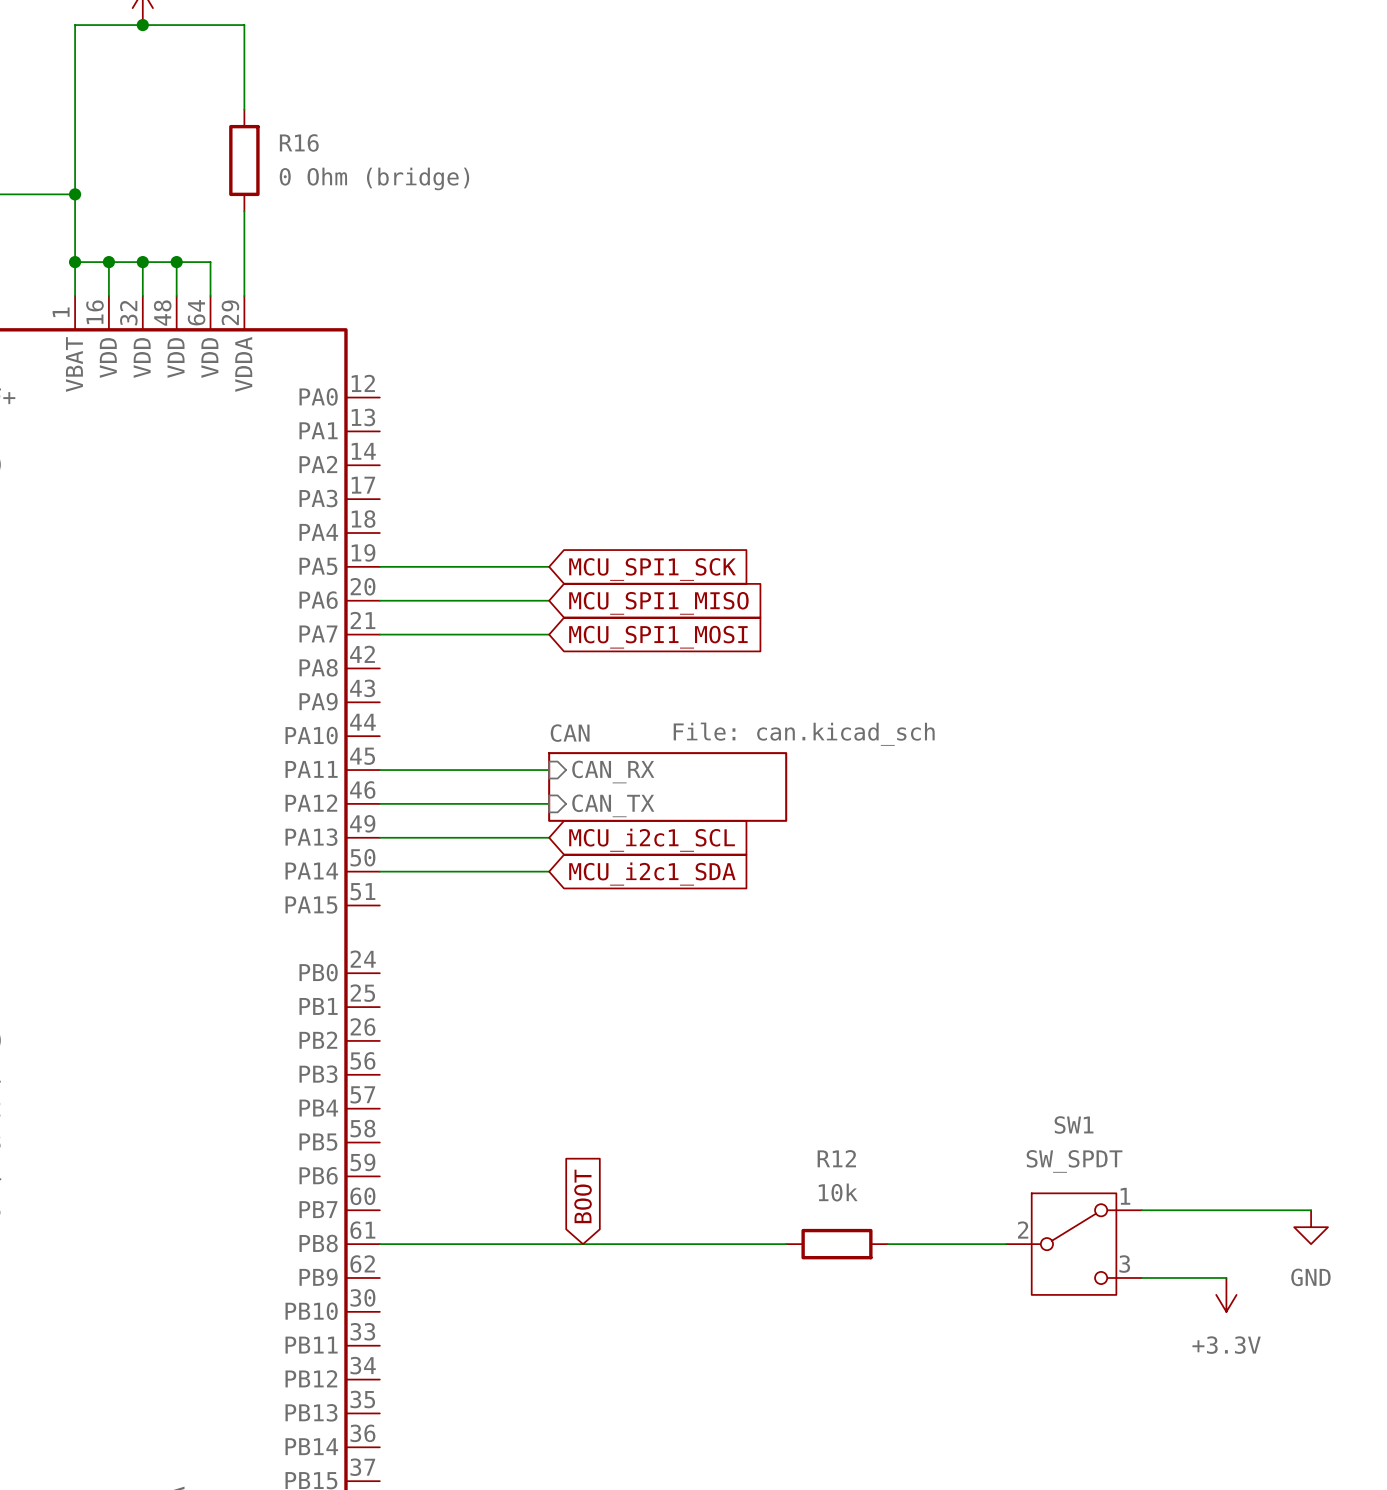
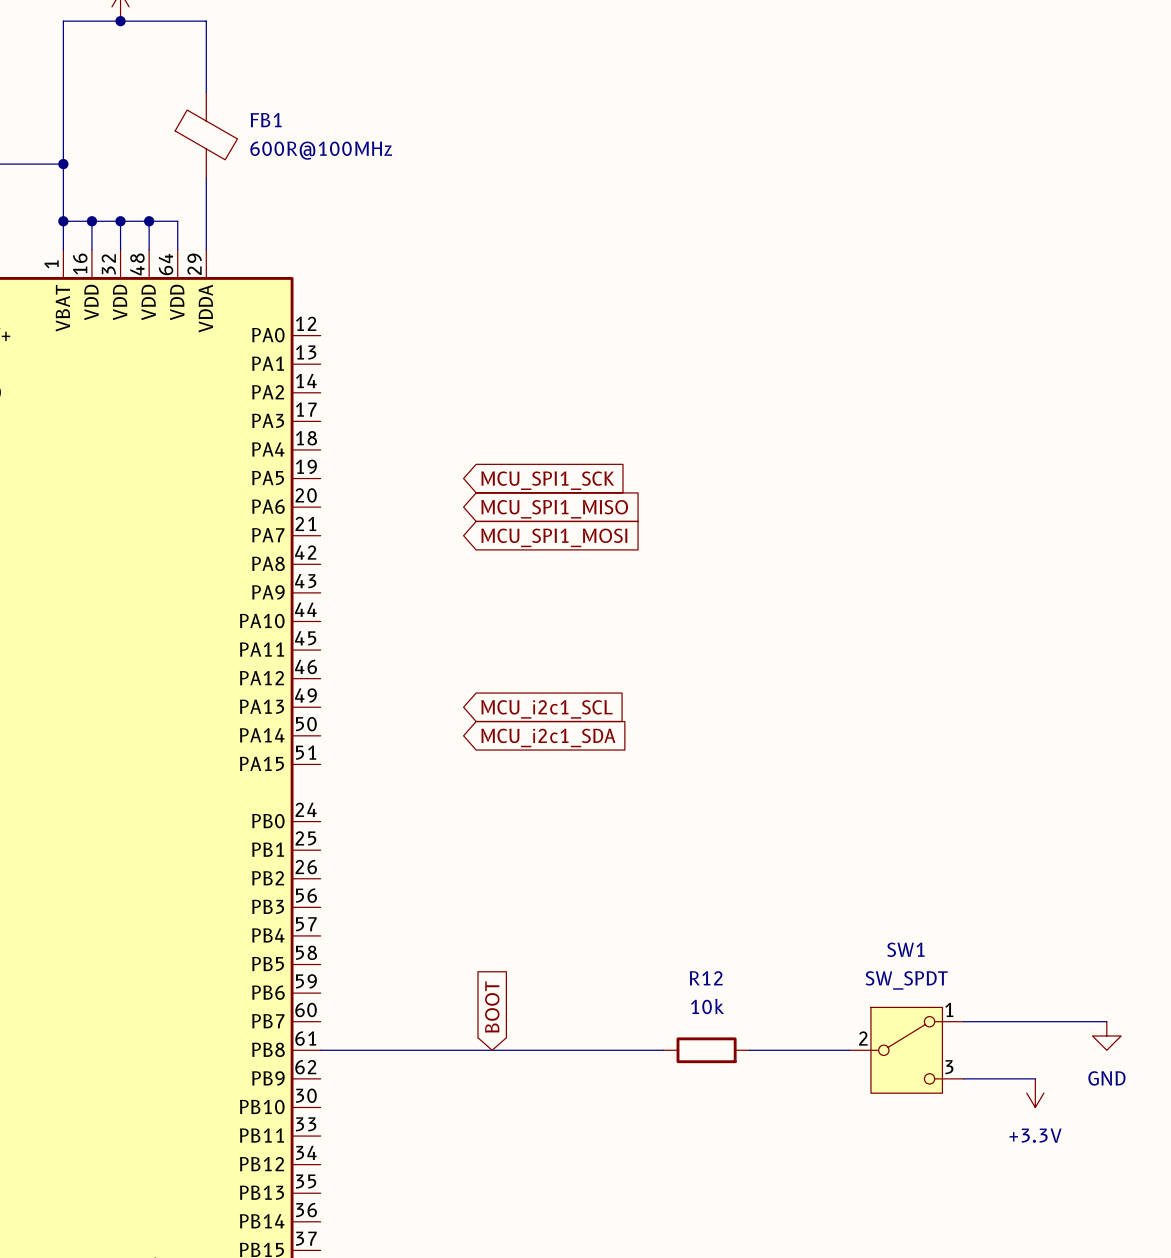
R16: 0 Ohm (bridge) (244, 160) -> none
FB1: none -> 600R@100MHz (206, 135)
wire: (379, 566) (549, 566) -> none
wire: (379, 600) (549, 600) -> none
wire: (379, 634) (549, 634) -> none
wire: (379, 770) (549, 770) -> none
sheet pin: CAN_RX (613, 771) -> none
sheet CAN: File: can.kicad_sch (667, 786) -> none
wire: (379, 803) (549, 803) -> none
sheet pin: CAN_TX (613, 805) -> none
wire: (379, 837) (549, 837) -> none
wire: (379, 871) (549, 871) -> none

